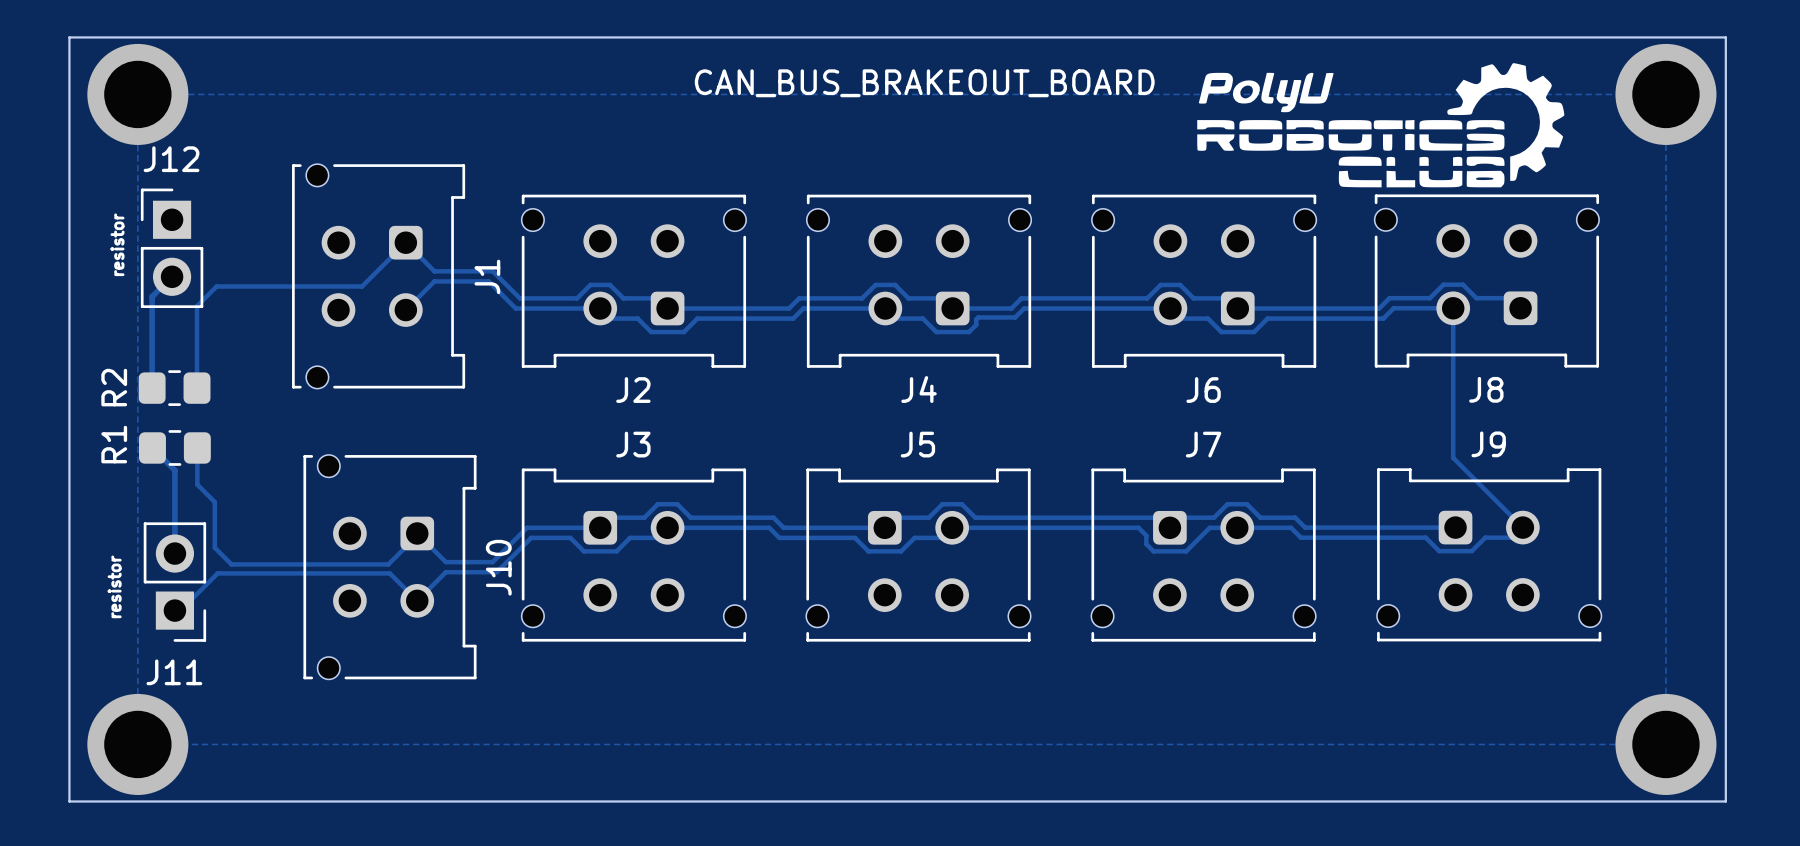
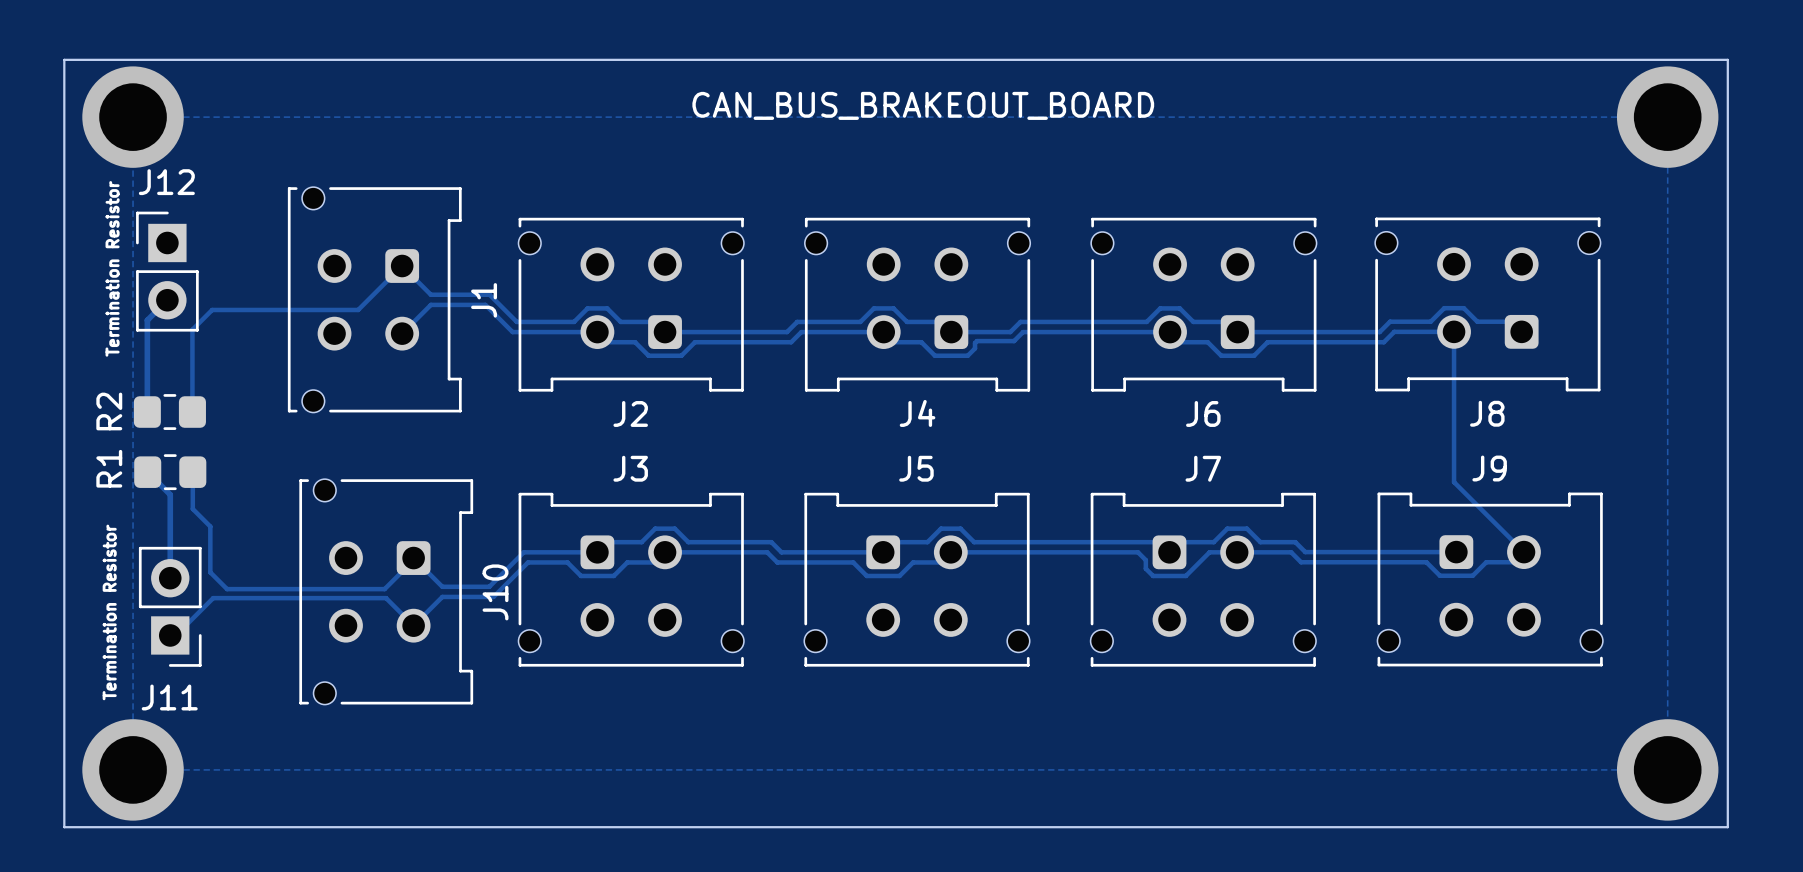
drawing: [1197, 63, 1565, 188] -> none
J12 value: resistor (117, 244) -> Termination Resistor (112, 268)
J11 value: resistor (114, 586) -> Termination Resistor (109, 612)

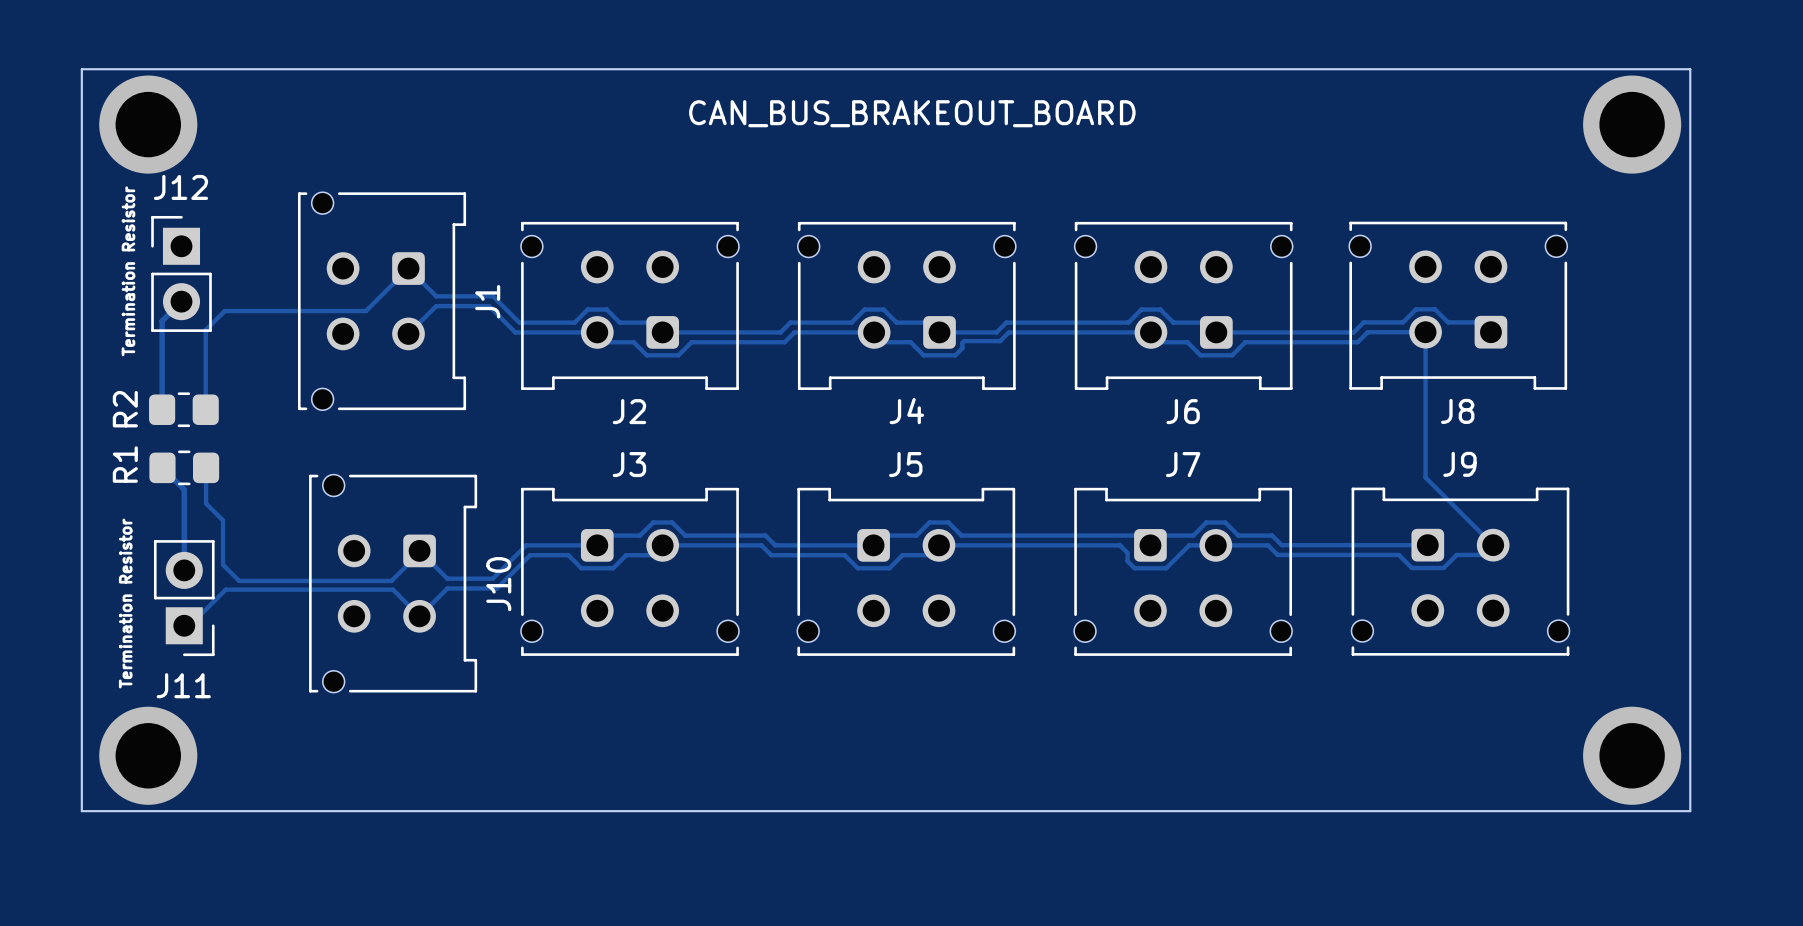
zone outline: (133, 117) (133, 769) (1667, 769) (1667, 117) (133, 117) -> none

